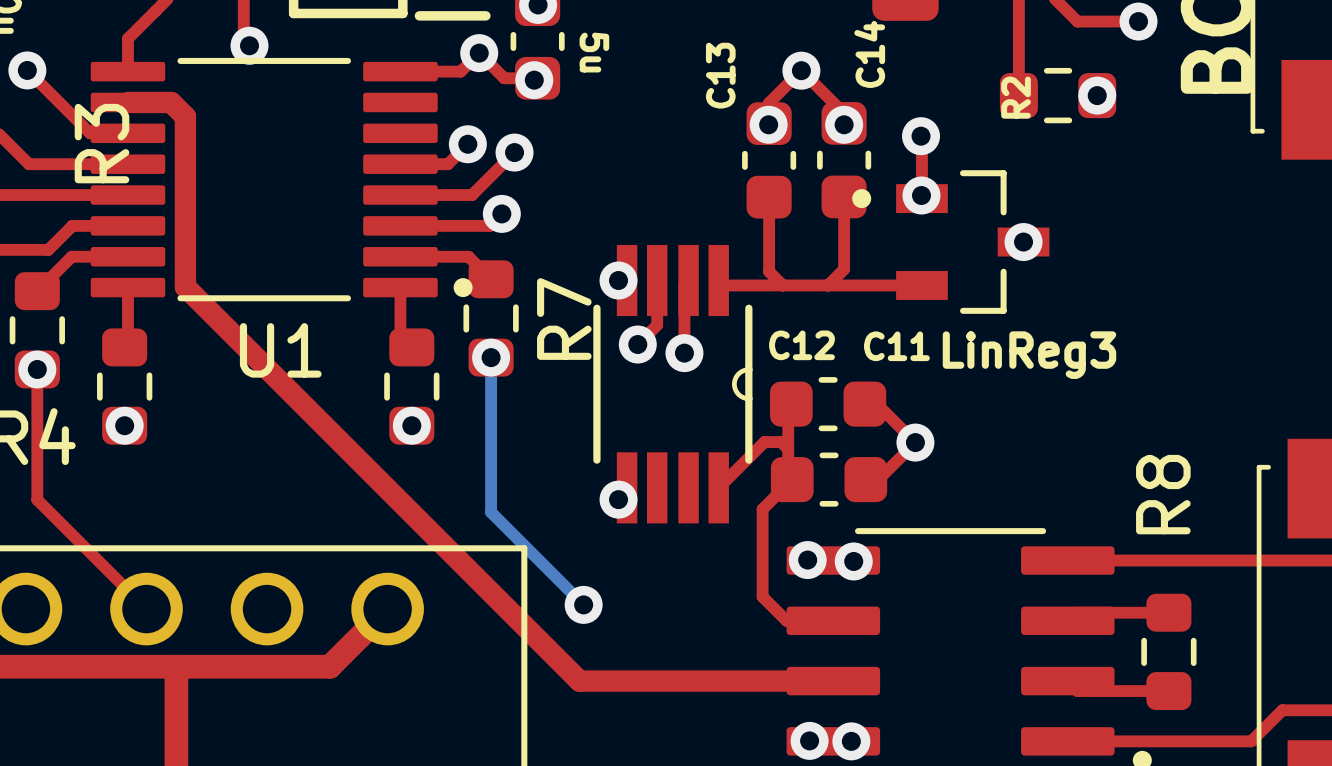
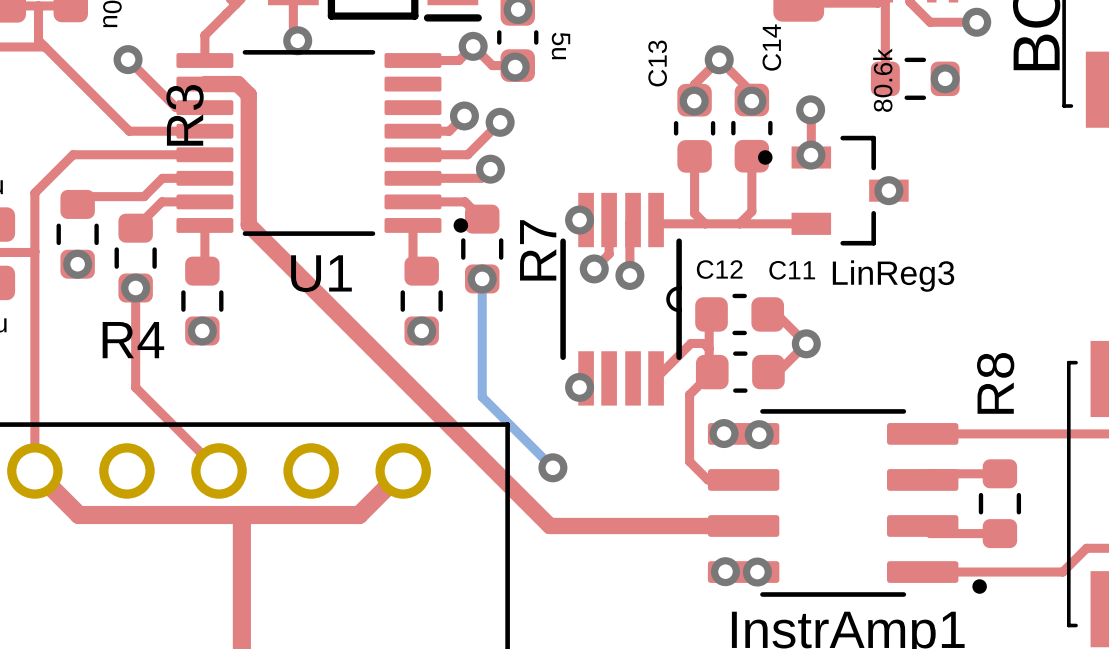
R2 name: R2 (1016, 97) -> 80.6k (882, 80)

